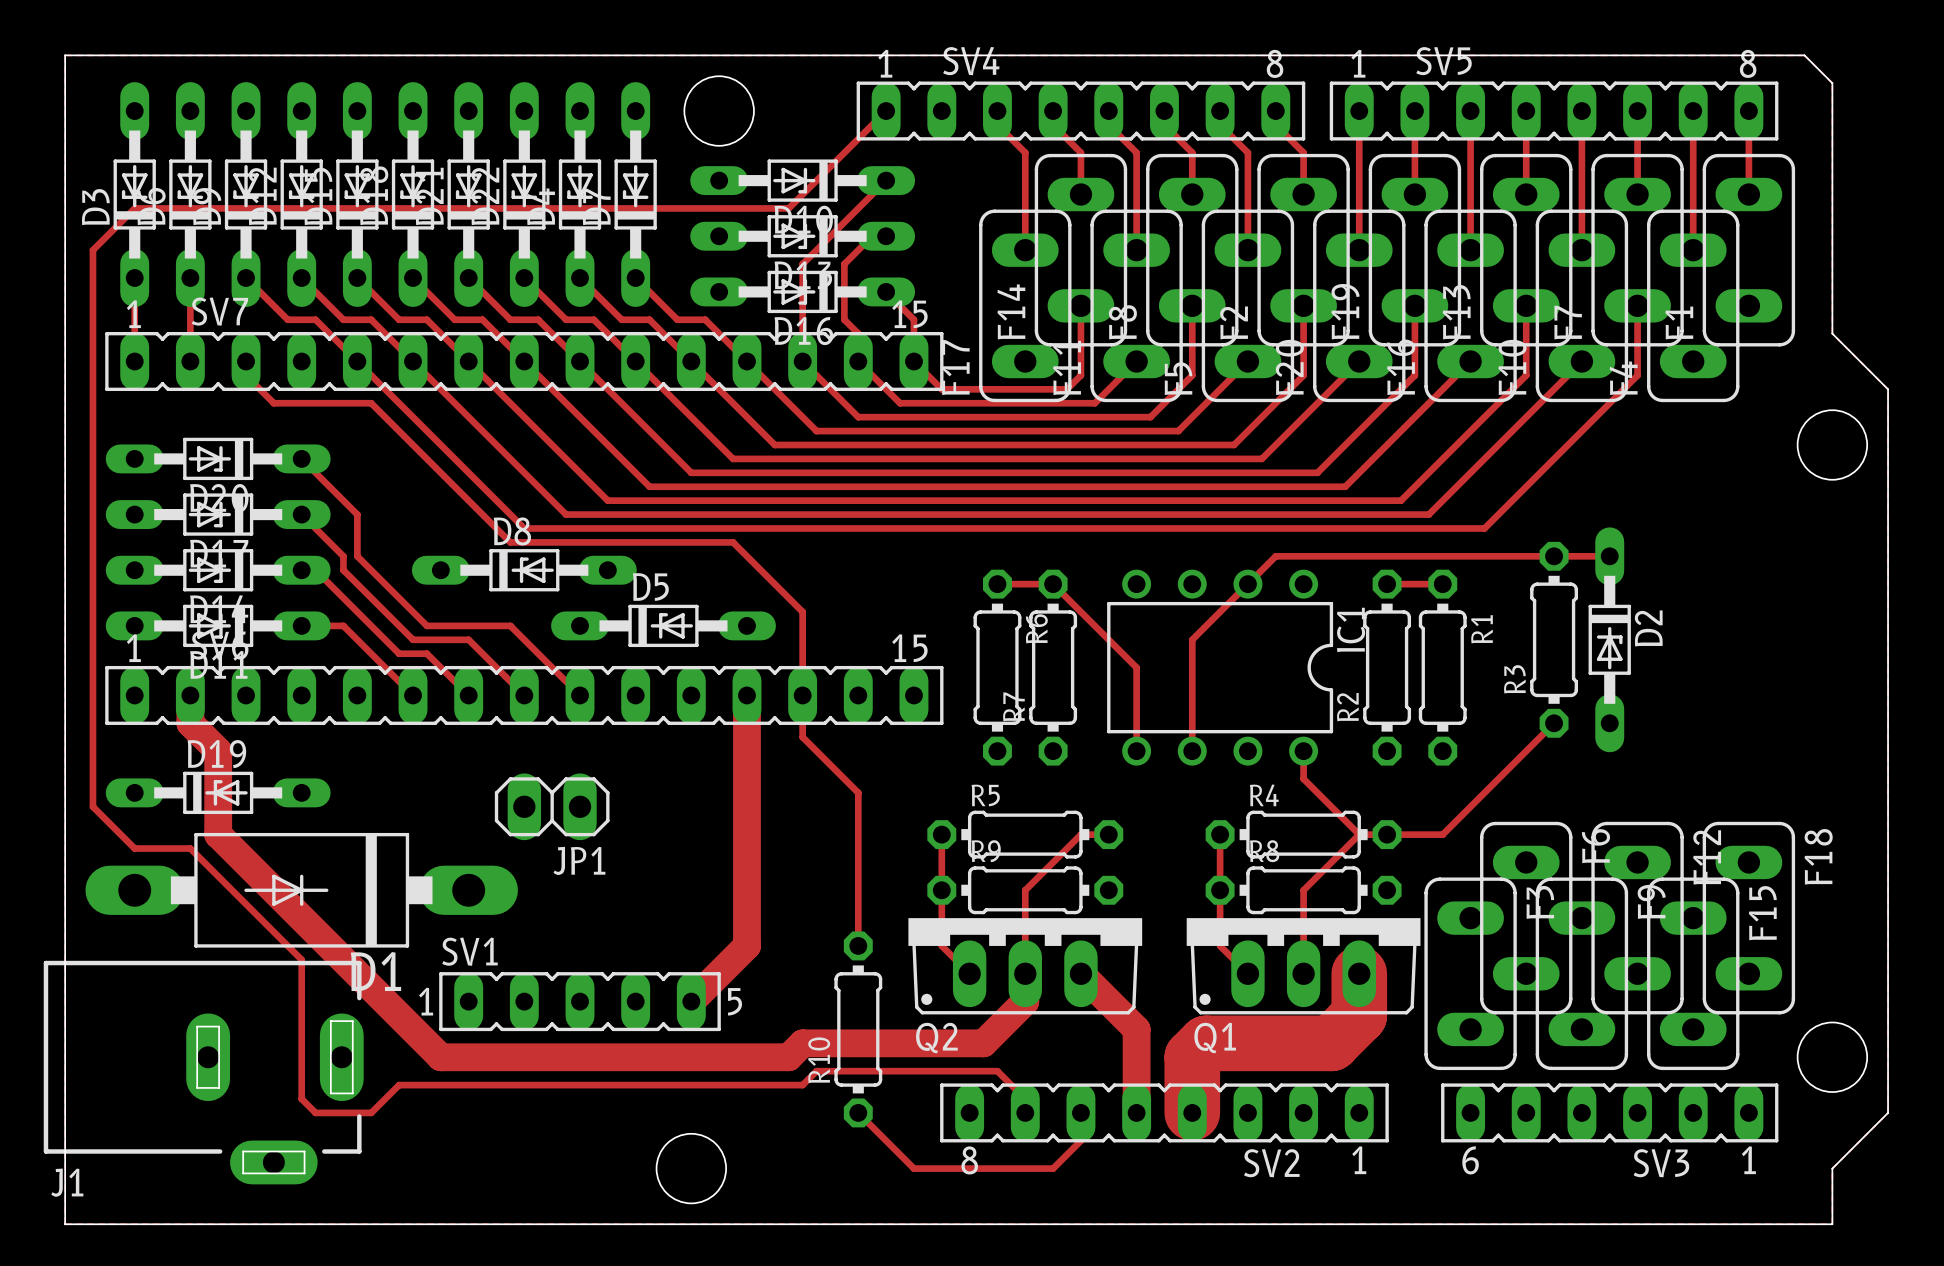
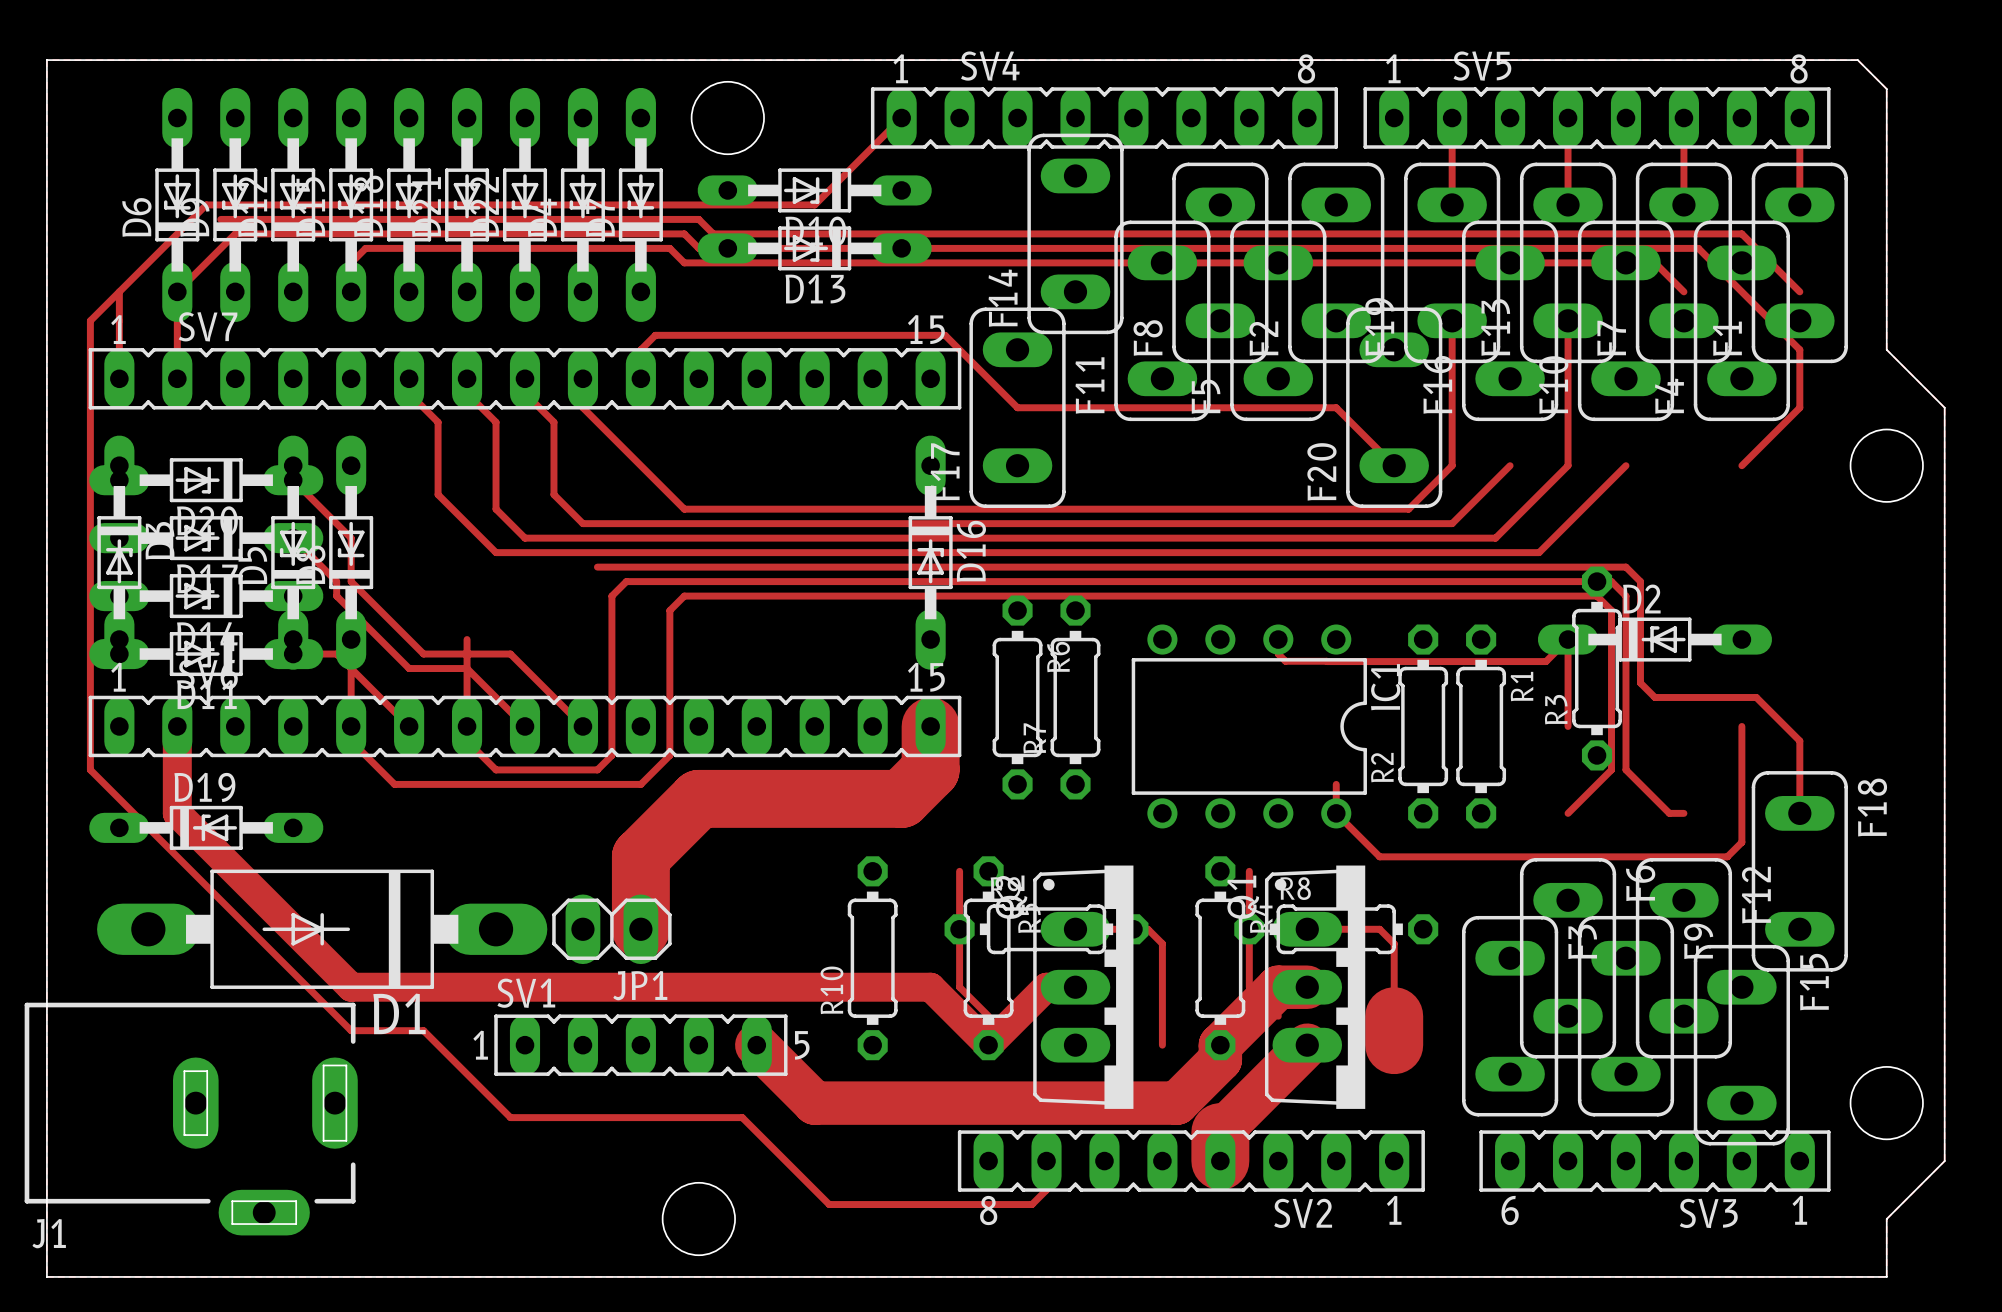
track: (997, 111) (997, 124) (1025, 152) (1025, 250) -> none
track: (1053, 111) (1053, 124) (1080, 152) (1080, 194) -> none
track: (1108, 111) (1108, 124) (1136, 152) (1136, 250) -> none
track: (1164, 111) (1164, 124) (1192, 152) (1192, 194) -> none
track: (1220, 111) (1220, 124) (1247, 152) (1247, 250) -> none
track: (1275, 111) (1275, 124) (1303, 152) (1303, 194) -> none
track: (1359, 111) (1359, 250) -> none
track: (1470, 111) (1470, 250) -> none
track: (1581, 111) (1581, 250) -> none
track: (1693, 111) (1693, 250) -> none
track: (886, 180) (802, 264) (802, 361) (858, 417) (1150, 417) (1192, 375) (1192, 305) -> none
D3 rotation: 0° (134, 194) -> 180° (119, 552)
D3 position: (134, 194) -> (119, 552)
track: (802, 194) (788, 208) (691, 208) -> (1799, 291) (1741, 233) (713, 233) (698, 219)
track: (232, 208) (134, 208) (92, 250) (92, 806) (134, 848) (190, 848) (301, 959) (301, 1099) (315, 1112) (371, 1112) (399, 1085) (802, 1085) (816, 1071) (997, 1071) (1025, 1099) (1025, 1112) -> (814, 204) (206, 204) (90, 320) (90, 769) (351, 1030) (423, 1030) (510, 1117) (742, 1117) (829, 1204) (1032, 1204) (1046, 1190) (1046, 1161)
track: (872, 236) (844, 264) (844, 319) (858, 333) (858, 361) (900, 403) (1094, 403) (1136, 361) -> (887, 248) (698, 248) (684, 233) (235, 233) (177, 291)
track: none -> (901, 248) (1698, 248) (1799, 349) (1799, 407) (1741, 465)
F14 position: (1080, 250) -> (1075, 233)
track: (246, 278) (287, 319) (315, 319) (524, 528) -> none
track: (301, 278) (343, 319) (371, 319) (566, 514) -> (467, 378) (467, 393) (496, 422) (496, 509) (525, 538) (568, 538)
track: (357, 278) (399, 319) (426, 319) (607, 500) -> (525, 378) (525, 393) (553, 422) (553, 494) (582, 523) (611, 523)
track: none -> (351, 291) (351, 262) (365, 248) (669, 248) (684, 262) (1654, 262) (1683, 291)
track: (413, 278) (454, 319) (482, 319) (649, 486) (677, 486) -> (582, 378) (582, 407) (684, 509)
track: (468, 278) (510, 319) (538, 319) (691, 472) (1317, 472) (1414, 375) -> none
track: (524, 278) (566, 319) (593, 319) (733, 458) (1261, 458) (1359, 361) -> none
track: (580, 278) (621, 319) (649, 319) (774, 444) (1234, 444) (1303, 375) (1303, 305) -> none
track: (635, 278) (677, 319) -> (640, 378) (640, 349) (655, 335) (684, 335)
D16 rotation: 0° (802, 291) -> 90° counterclockwise (930, 552)
D16 position: (802, 291) -> (930, 552)
track: (886, 291) (913, 319) (913, 361) (941, 389) (997, 389) -> (713, 335) (945, 335) (1017, 407)
F17 position: (1025, 305) -> (1017, 407)
track: (1080, 305) (1080, 375) (1067, 389) -> (1394, 465) (1336, 407) (1089, 407)
F20 position: (1359, 305) -> (1394, 407)
track: (1637, 305) (1637, 375) (1484, 528) -> (1625, 465) (1539, 552) (1524, 552)
track: (705, 319) (816, 431) (1178, 431) (1247, 361) -> none
track: (246, 361) (246, 375) (273, 403) (371, 403) (440, 472) -> (409, 378) (409, 393) (438, 422) (438, 494)
track: (1470, 361) (1345, 486) -> (1452, 393) (1452, 465) (1408, 509) (1379, 509)
track: (1581, 361) (1428, 514) -> none
track: (1526, 375) (1401, 500) -> (1568, 393) (1568, 465) (1495, 538) (1466, 538)
track: none -> (1510, 465) (1452, 523) (1437, 523)
track: (496, 528) (510, 542) (593, 542) -> (496, 552) (525, 552)
track: (733, 542) (802, 611) (802, 737) (858, 792) (858, 945) -> (742, 567) (1625, 567) (1640, 581) (1640, 683) (1654, 697) (1756, 697) (1799, 740) (1799, 813)
track: (1275, 556) (1192, 639) (1192, 751) -> (1307, 581) (626, 581) (611, 596) (611, 755) (597, 769) (496, 769) (467, 740) (467, 639)
track: (1567, 556) (1609, 556) -> (1611, 581) (1625, 596) (1625, 769) (1669, 813) (1683, 813)
track: (301, 570) (315, 570) (399, 653) (426, 653) (468, 695) -> none
D8 rotation: 0° (524, 570) -> 90° counterclockwise (351, 552)
D8 position: (524, 570) -> (351, 552)
track: (997, 584) (1053, 584) (1136, 667) (1136, 751) -> none
track: (1387, 584) (1442, 584) -> none
track: none -> (351, 639) (351, 740) (394, 784) (640, 784) (669, 755) (669, 610) (684, 596) (1597, 596) (1611, 610) (1611, 769) (1568, 813)
track: none -> (1278, 639) (1278, 654) (1285, 661) (1326, 661)
D5 rotation: 0° (663, 625) -> 90° counterclockwise (293, 552)
D5 position: (663, 625) -> (293, 552)
track: none -> (1327, 661) (1546, 661) (1568, 639) (1568, 726)
D2 rotation: 0° (1609, 639) -> 90° counterclockwise (1654, 639)
IC1 position: (1220, 667) -> (1249, 726)
R2 position: (1387, 667) -> (1423, 726)
R1 position: (1442, 667) -> (1481, 726)
track: (746, 695) (746, 945) (691, 1001) -> none
track: none -> (930, 726) (930, 769) (901, 798) (698, 798) (640, 856) (640, 929)
track: (190, 723) (218, 751) (218, 834) (440, 1057) (788, 1057) (802, 1043) (983, 1043) (1025, 1001) (1025, 890) (1080, 834) (1108, 834) -> (177, 755) (177, 813) (351, 987) (930, 987) (988, 1045) (1046, 987) (1075, 987)
track: (1554, 723) (1442, 834) (1359, 834) -> none
JP1 position: (552, 806) -> (611, 929)
track: (1345, 820) (1359, 834) -> (1379, 856) (1727, 856) (1741, 842) (1741, 726)
R5 rotation: 0° (1025, 834) -> 90° clockwise (988, 958)
R4 rotation: 0° (1303, 834) -> 90° clockwise (1220, 958)
R4 position: (1303, 834) -> (1220, 958)
track: (1359, 834) (1303, 890) (1303, 973) -> none
D1 position: (301, 890) -> (322, 929)
track: none -> (1075, 929) (1147, 929) (1162, 943) (1162, 1045)
track: none -> (1307, 929) (1379, 929) (1394, 943) (1394, 1016)
F18 position: (1748, 918) -> (1799, 871)
track: none -> (1307, 987) (1278, 987) (1220, 1045) (1220, 1059) (1176, 1103) (814, 1103) (756, 1045)
Q2 rotation: 0° (1025, 966) -> 90° clockwise (1083, 987)
Q1 rotation: 0° (1303, 966) -> 90° clockwise (1315, 987)
track: (1080, 973) (1136, 1029) (1136, 1112) -> none
F15 position: (1693, 973) -> (1741, 1045)
SV1 position: (580, 1001) -> (640, 1045)
track: (1359, 1001) (1359, 1015) (1331, 1043) (1206, 1043) (1192, 1057) (1192, 1085) -> (1307, 1045) (1220, 1132)
R10 position: (858, 1029) -> (872, 958)
track: (858, 1112) (913, 1168) (1053, 1168) (1080, 1140) (1080, 1112) -> none

